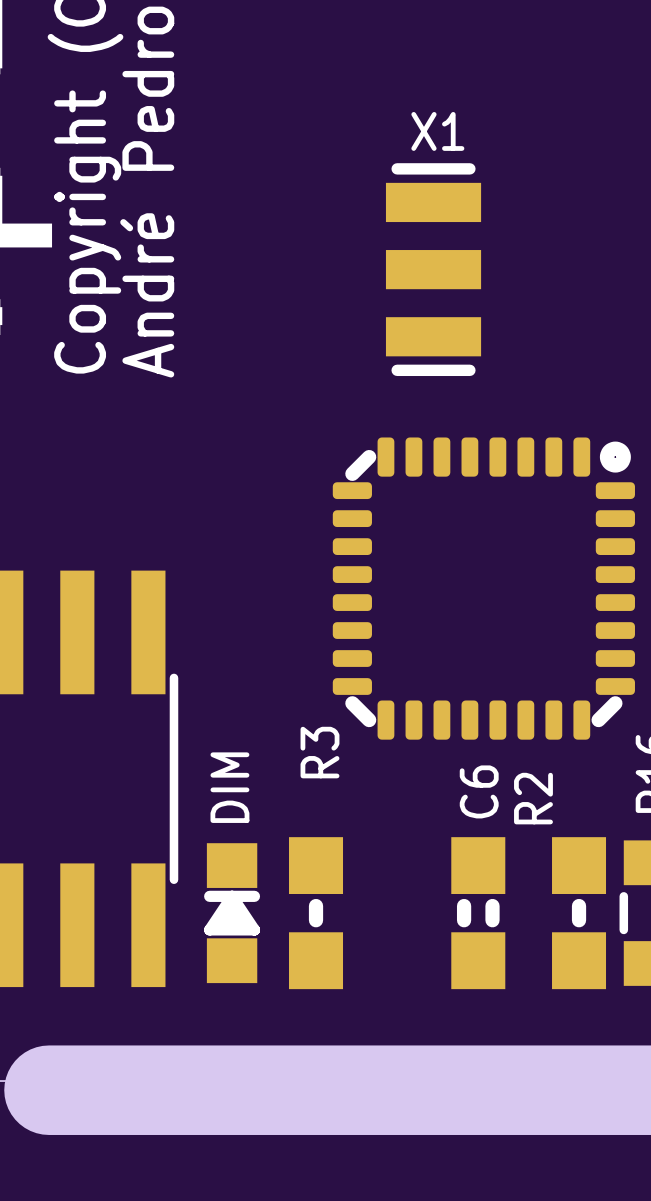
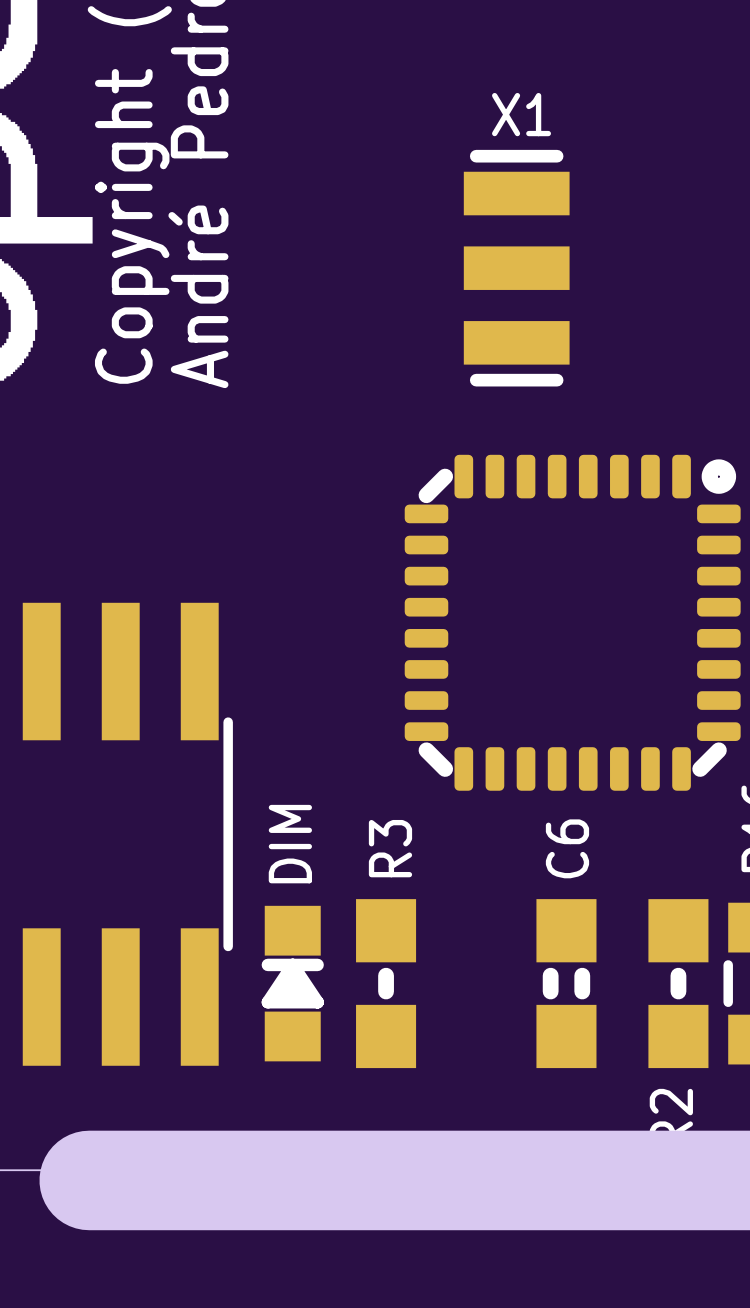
R3 name position: R3 (319, 752) -> R3 (390, 848)
R2 name position: R2 (533, 798) -> R2 (671, 1117)

